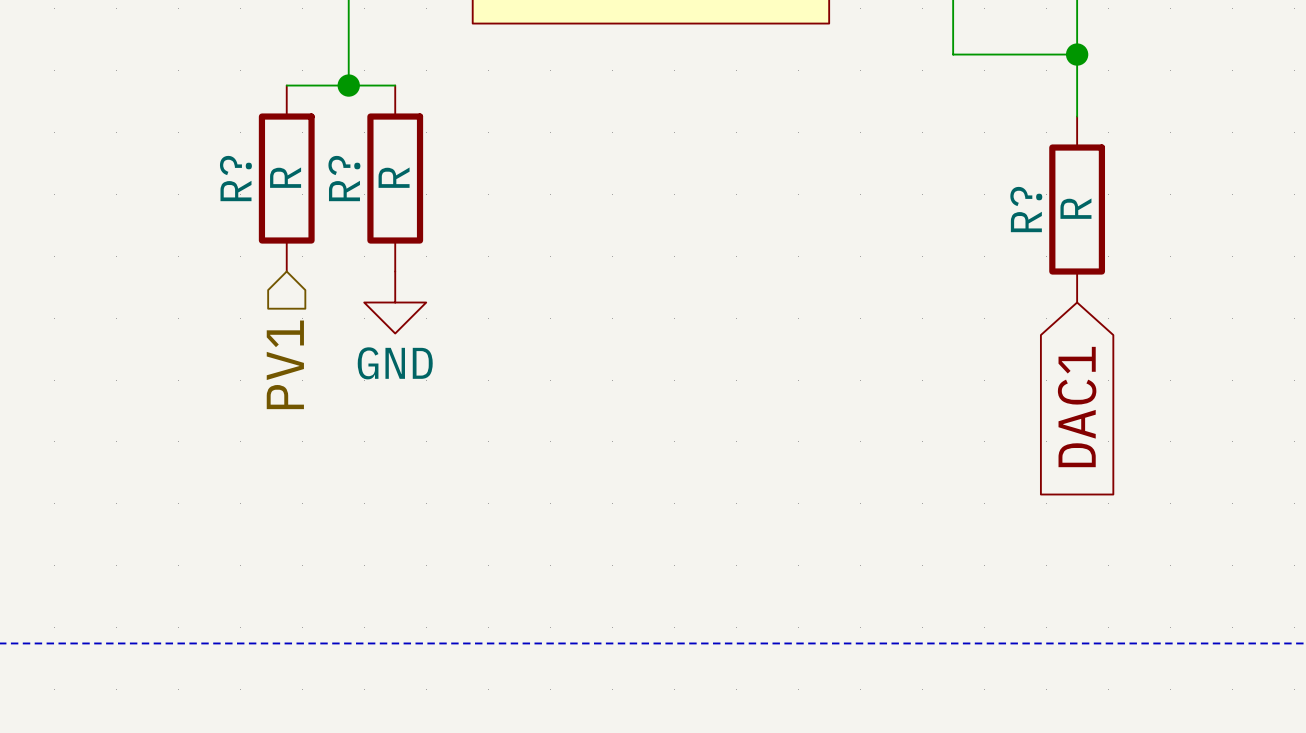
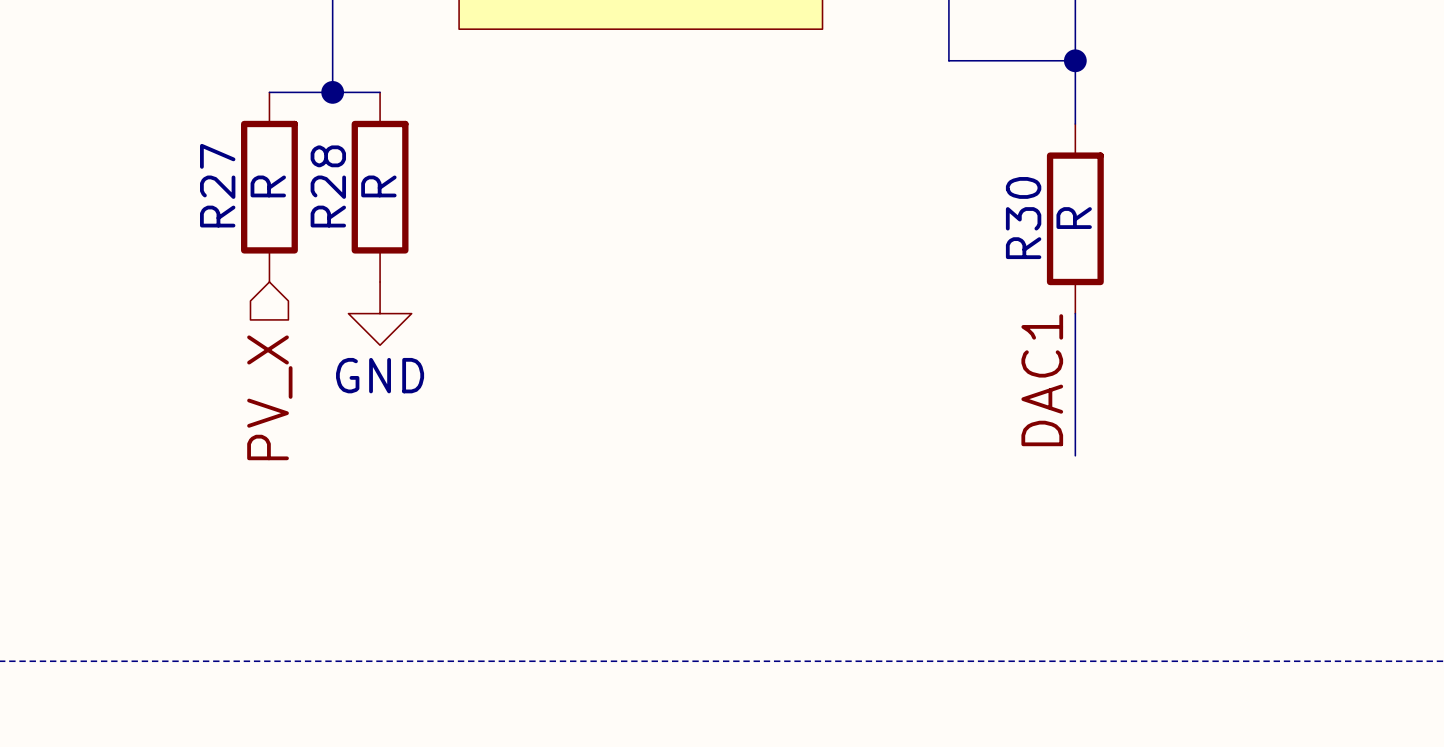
R? name: R? (235, 178) -> R27 (217, 185)
R? name: R? (344, 178) -> R28 (328, 186)
R? name: R? (1026, 209) -> R30 (1023, 218)
wire: none -> (1075, 313) (1075, 455)
hierarchical label: PV1 (285, 364) -> PV_X (269, 397)
label: none -> DAC1 (1042, 380)
global label: DAC1 (1077, 407) -> none

